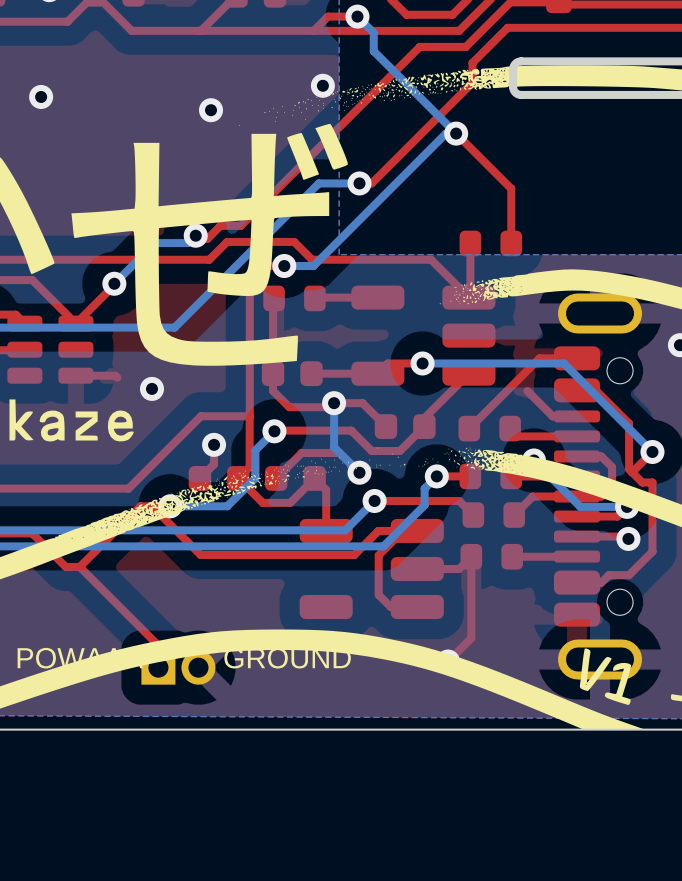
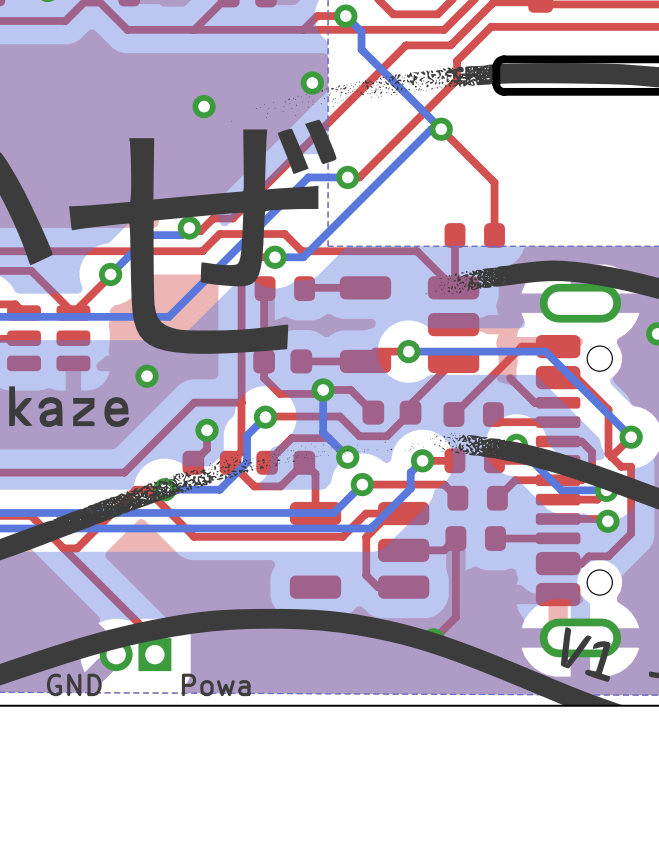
via: (41, 96) -> none
top track: (75, 375) (115, 375) (117, 377) -> none
top track: none -> (63, 548) (154, 639) (154, 654)
top track: (79, 566) (158, 645) (158, 667) -> none
part side: bottom (178, 667) -> top (135, 654)

